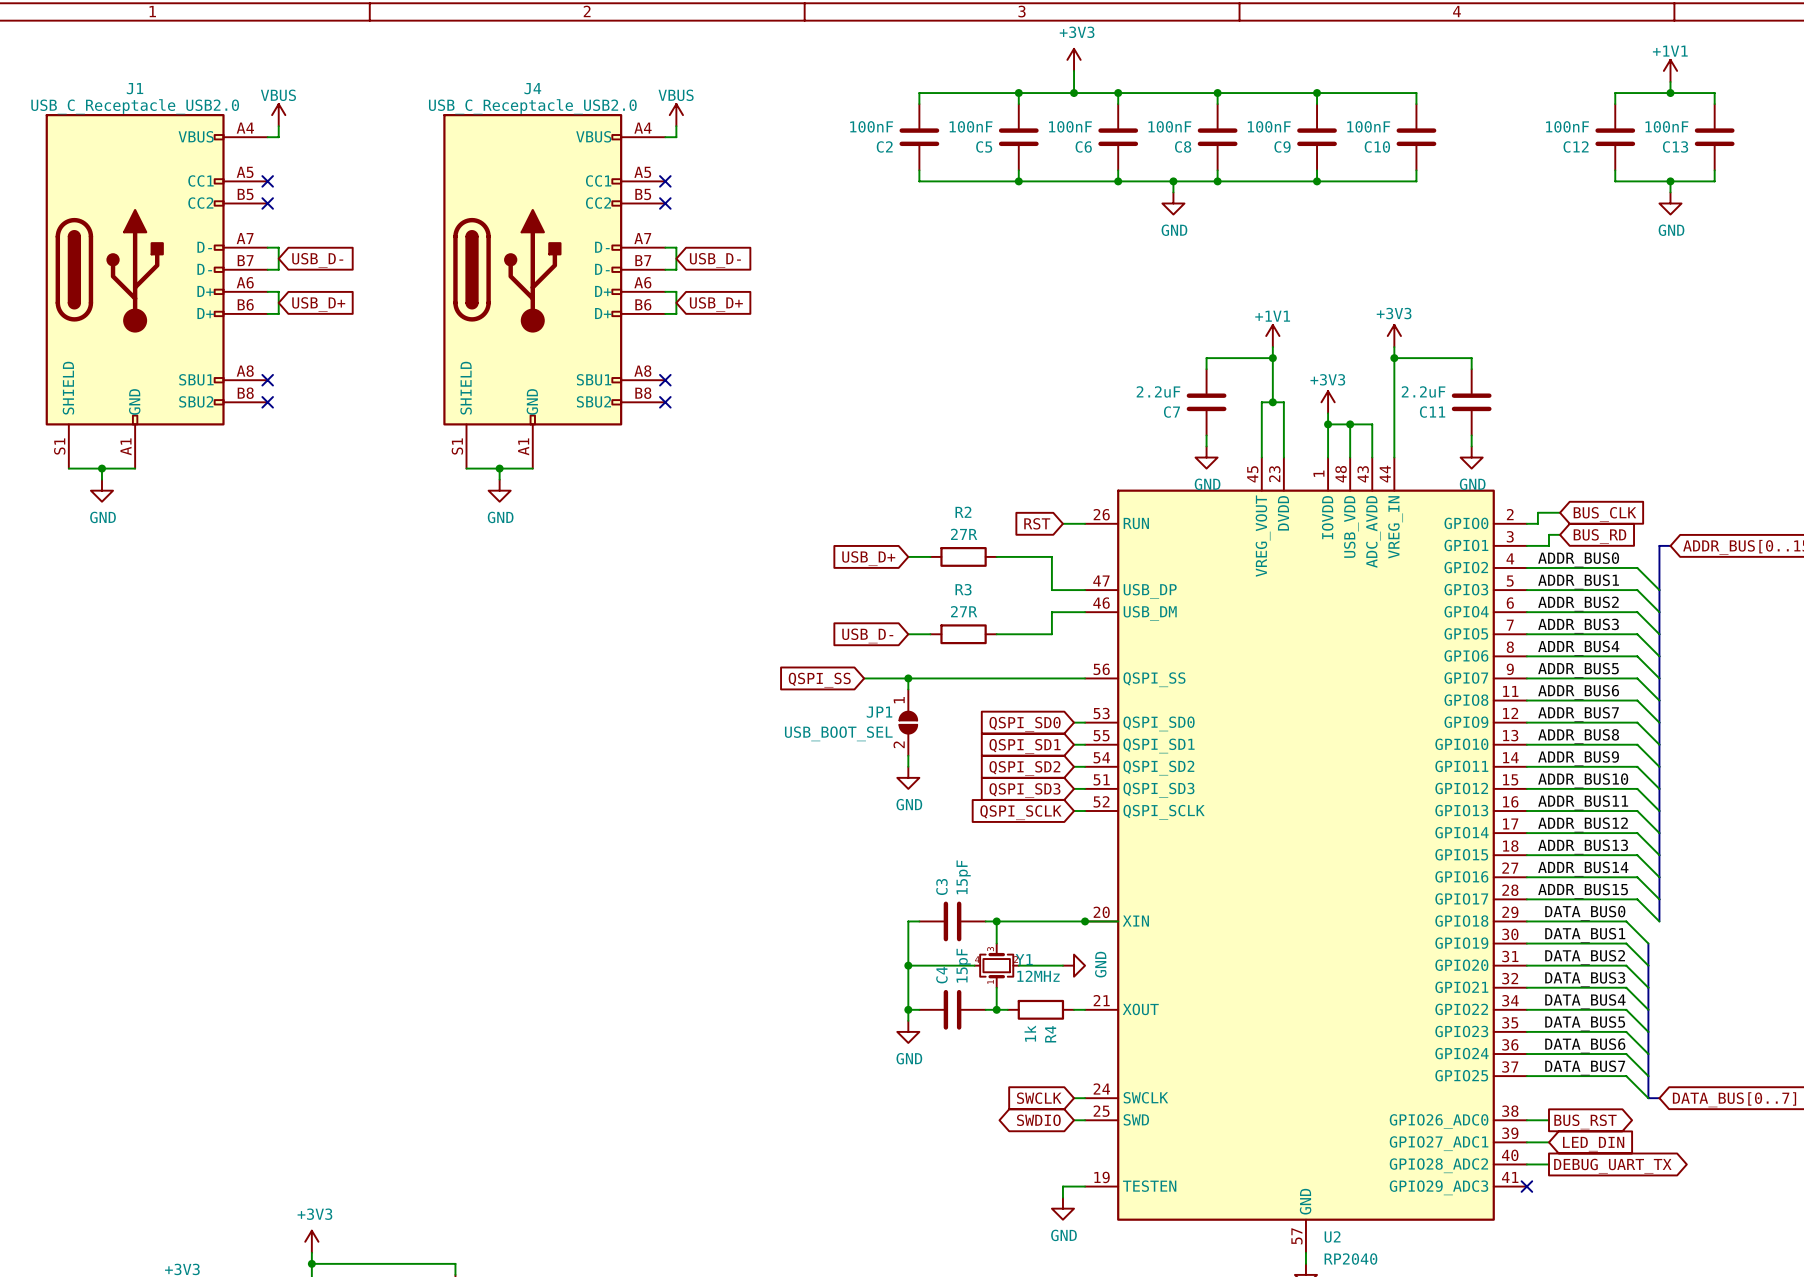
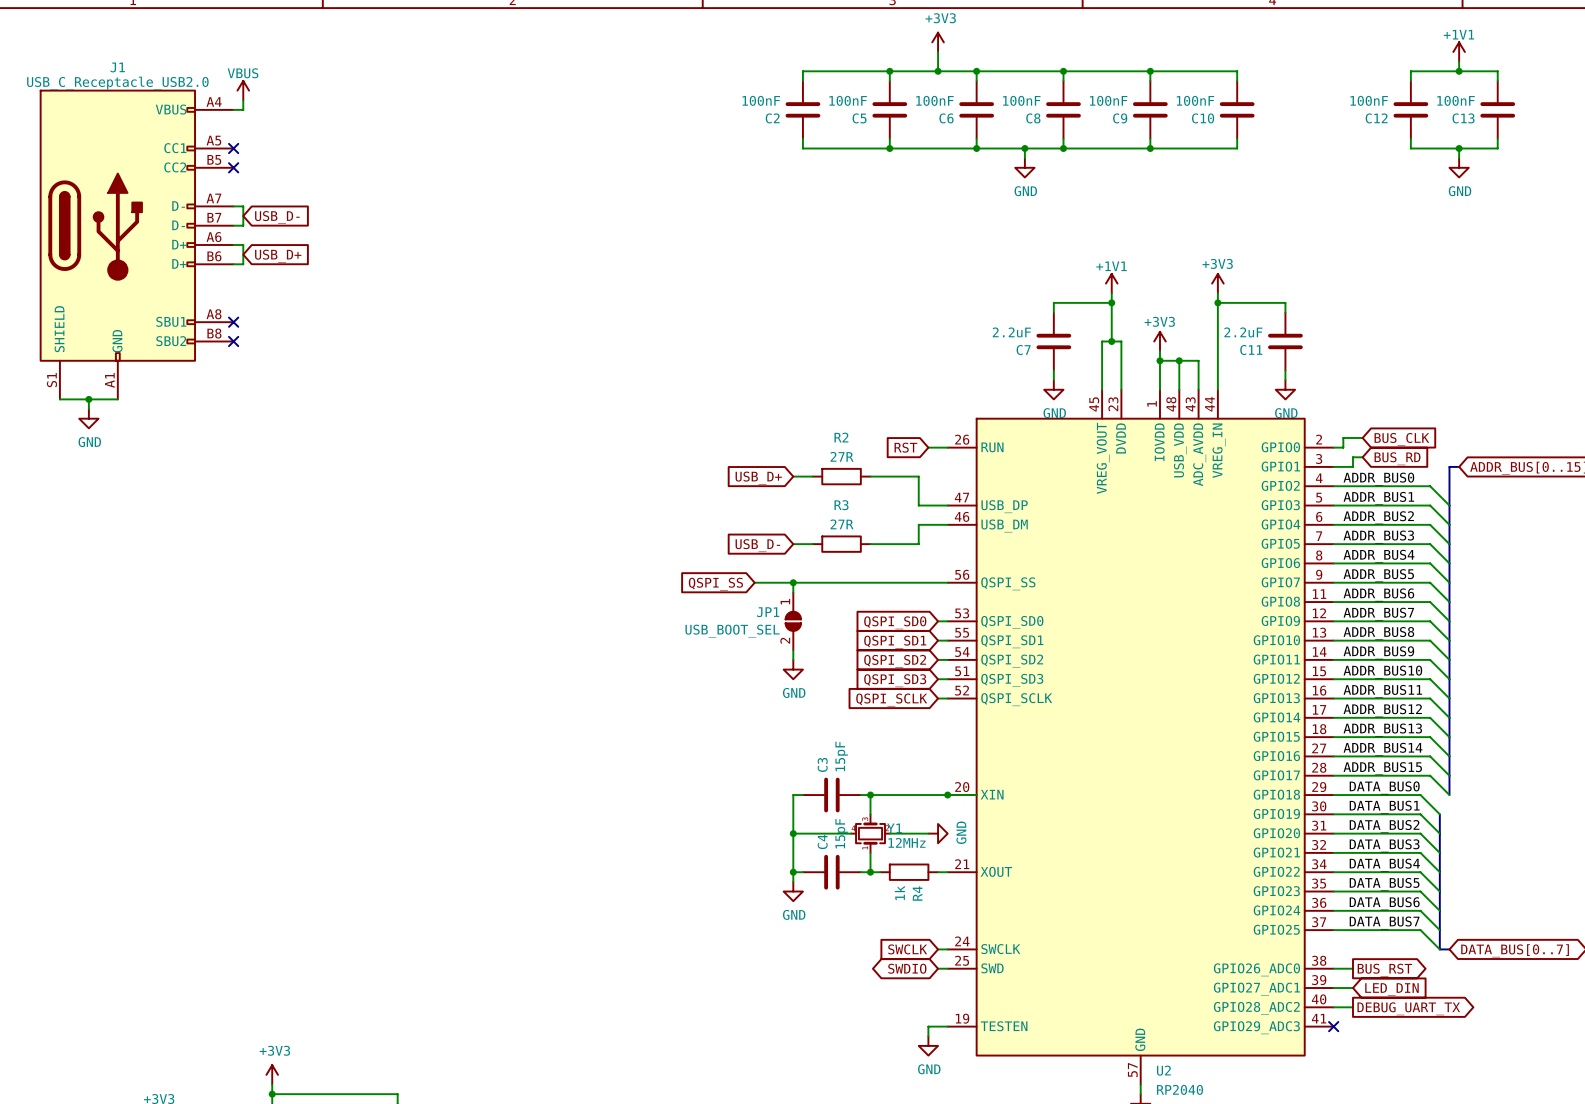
power symbol: VBUS (676, 115) -> none
wire: (676, 126) (676, 137) (665, 137) -> none
no-connect mark: (665, 181) -> none
no-connect mark: (665, 203) -> none
wire: (665, 247) (676, 247) (676, 269) (665, 269) -> none
global label: USB_D- (715, 260) -> none
J4: USB_C_Receptacle_USB2.0 (554, 291) -> none
wire: (665, 291) (676, 291) (676, 313) (665, 313) -> none
global label: USB_D+ (716, 304) -> none
no-connect mark: (665, 380) -> none
no-connect mark: (665, 402) -> none
wire: (466, 468) (532, 468) -> none
wire: (499, 468) (499, 479) -> none
junction: (499, 468) -> none
power symbol: GND (499, 490) -> none

